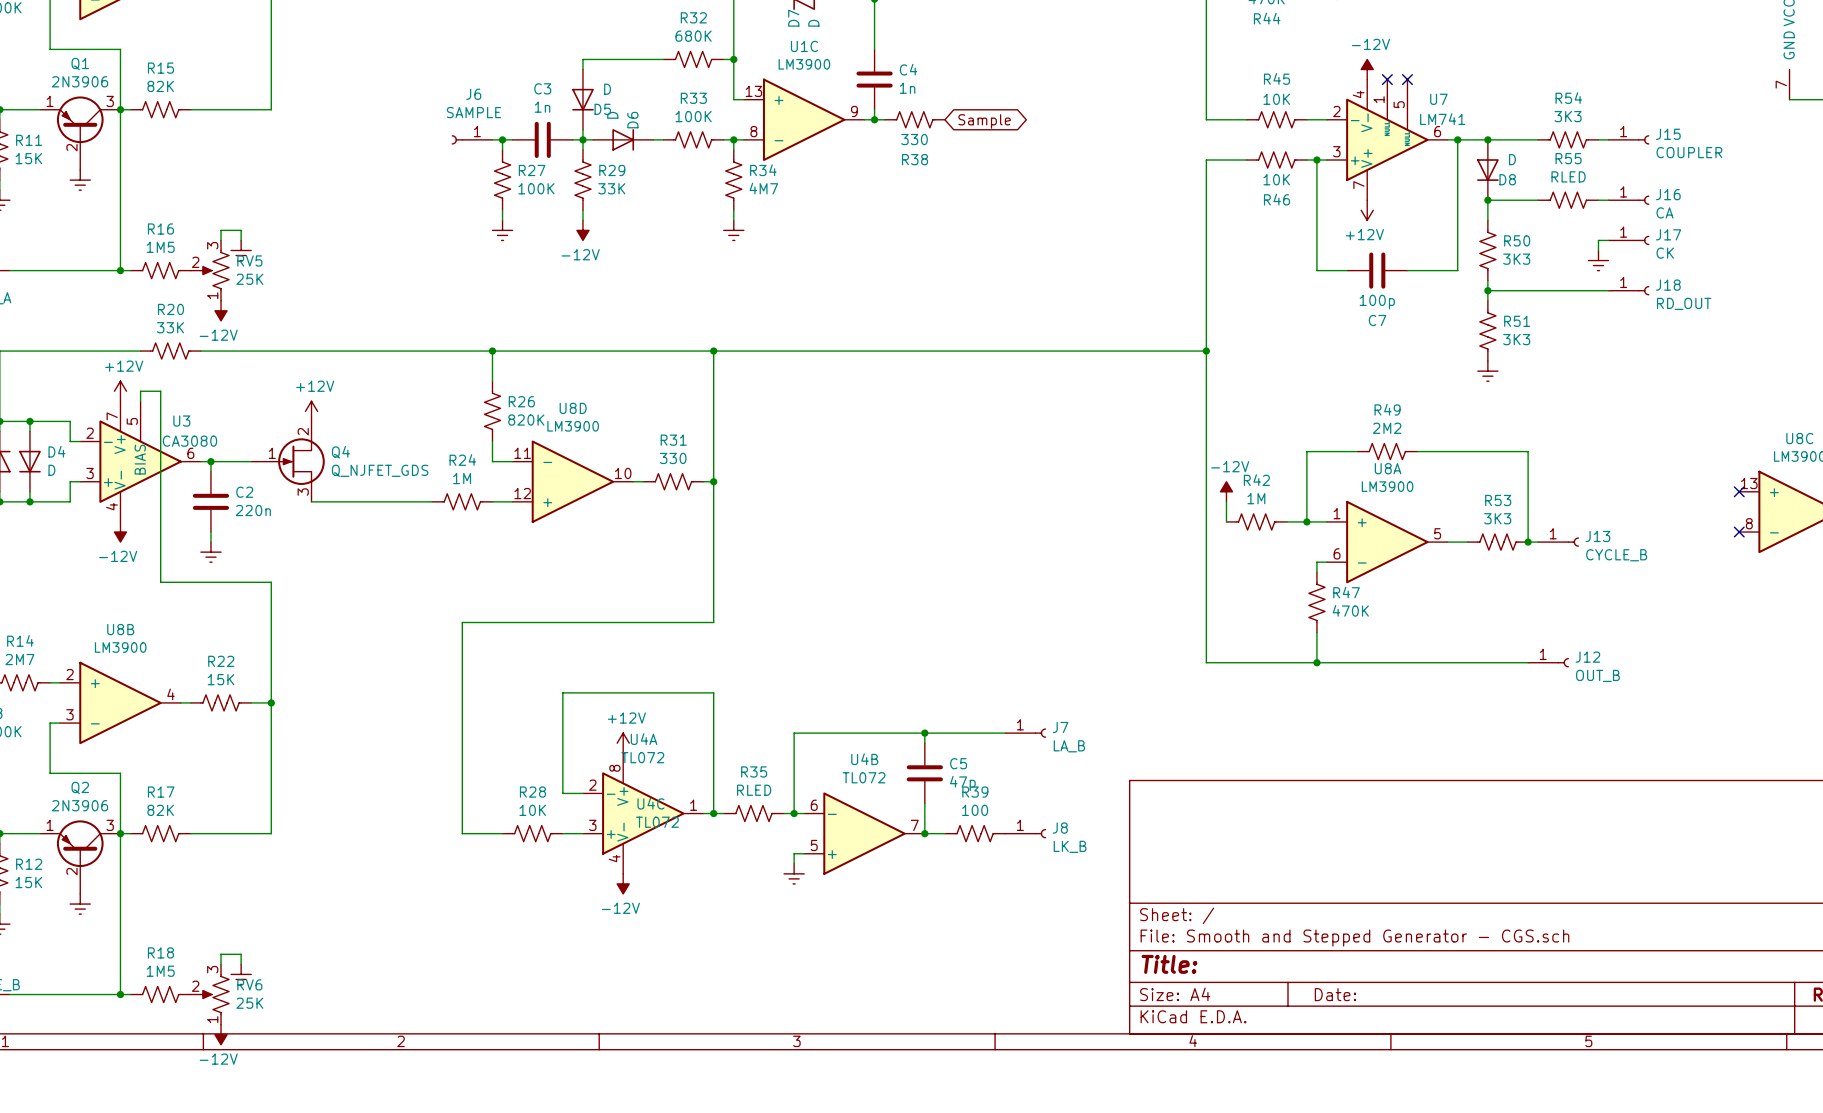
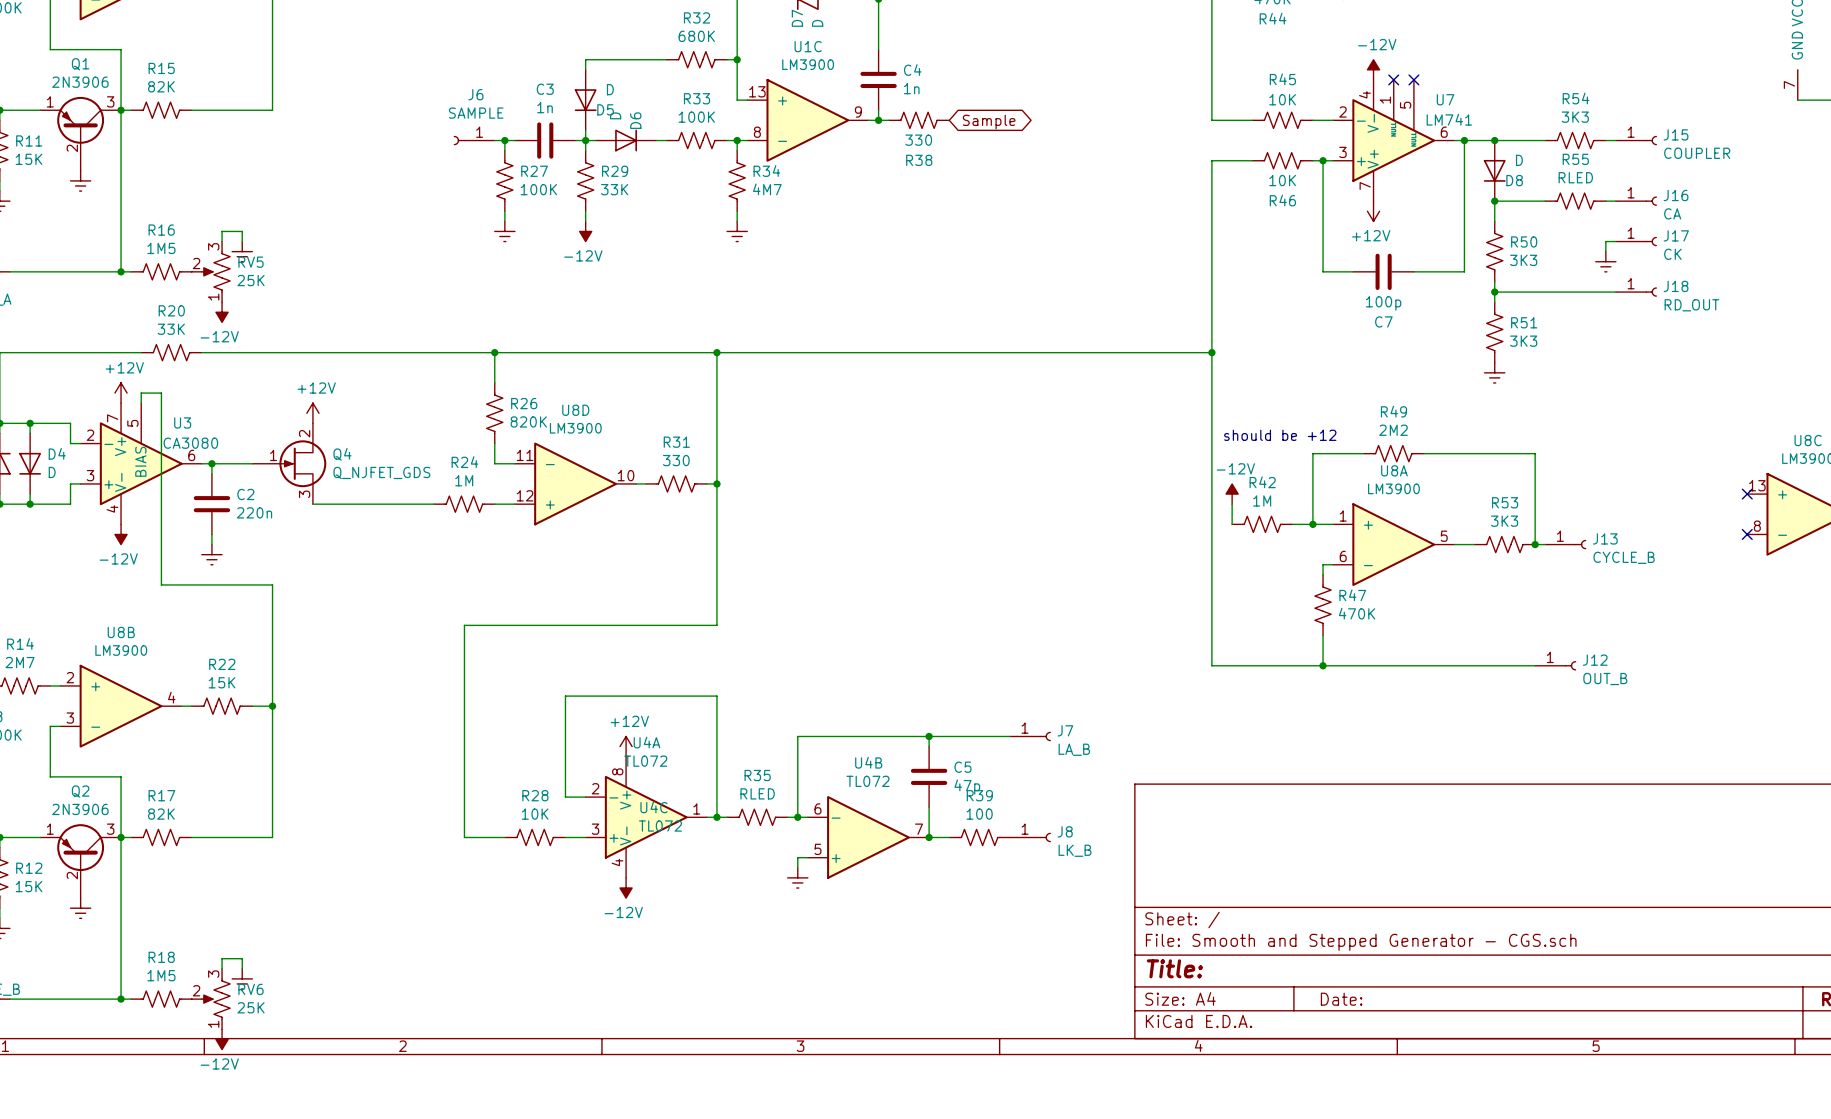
text: none -> should be +12 (1280, 435)

